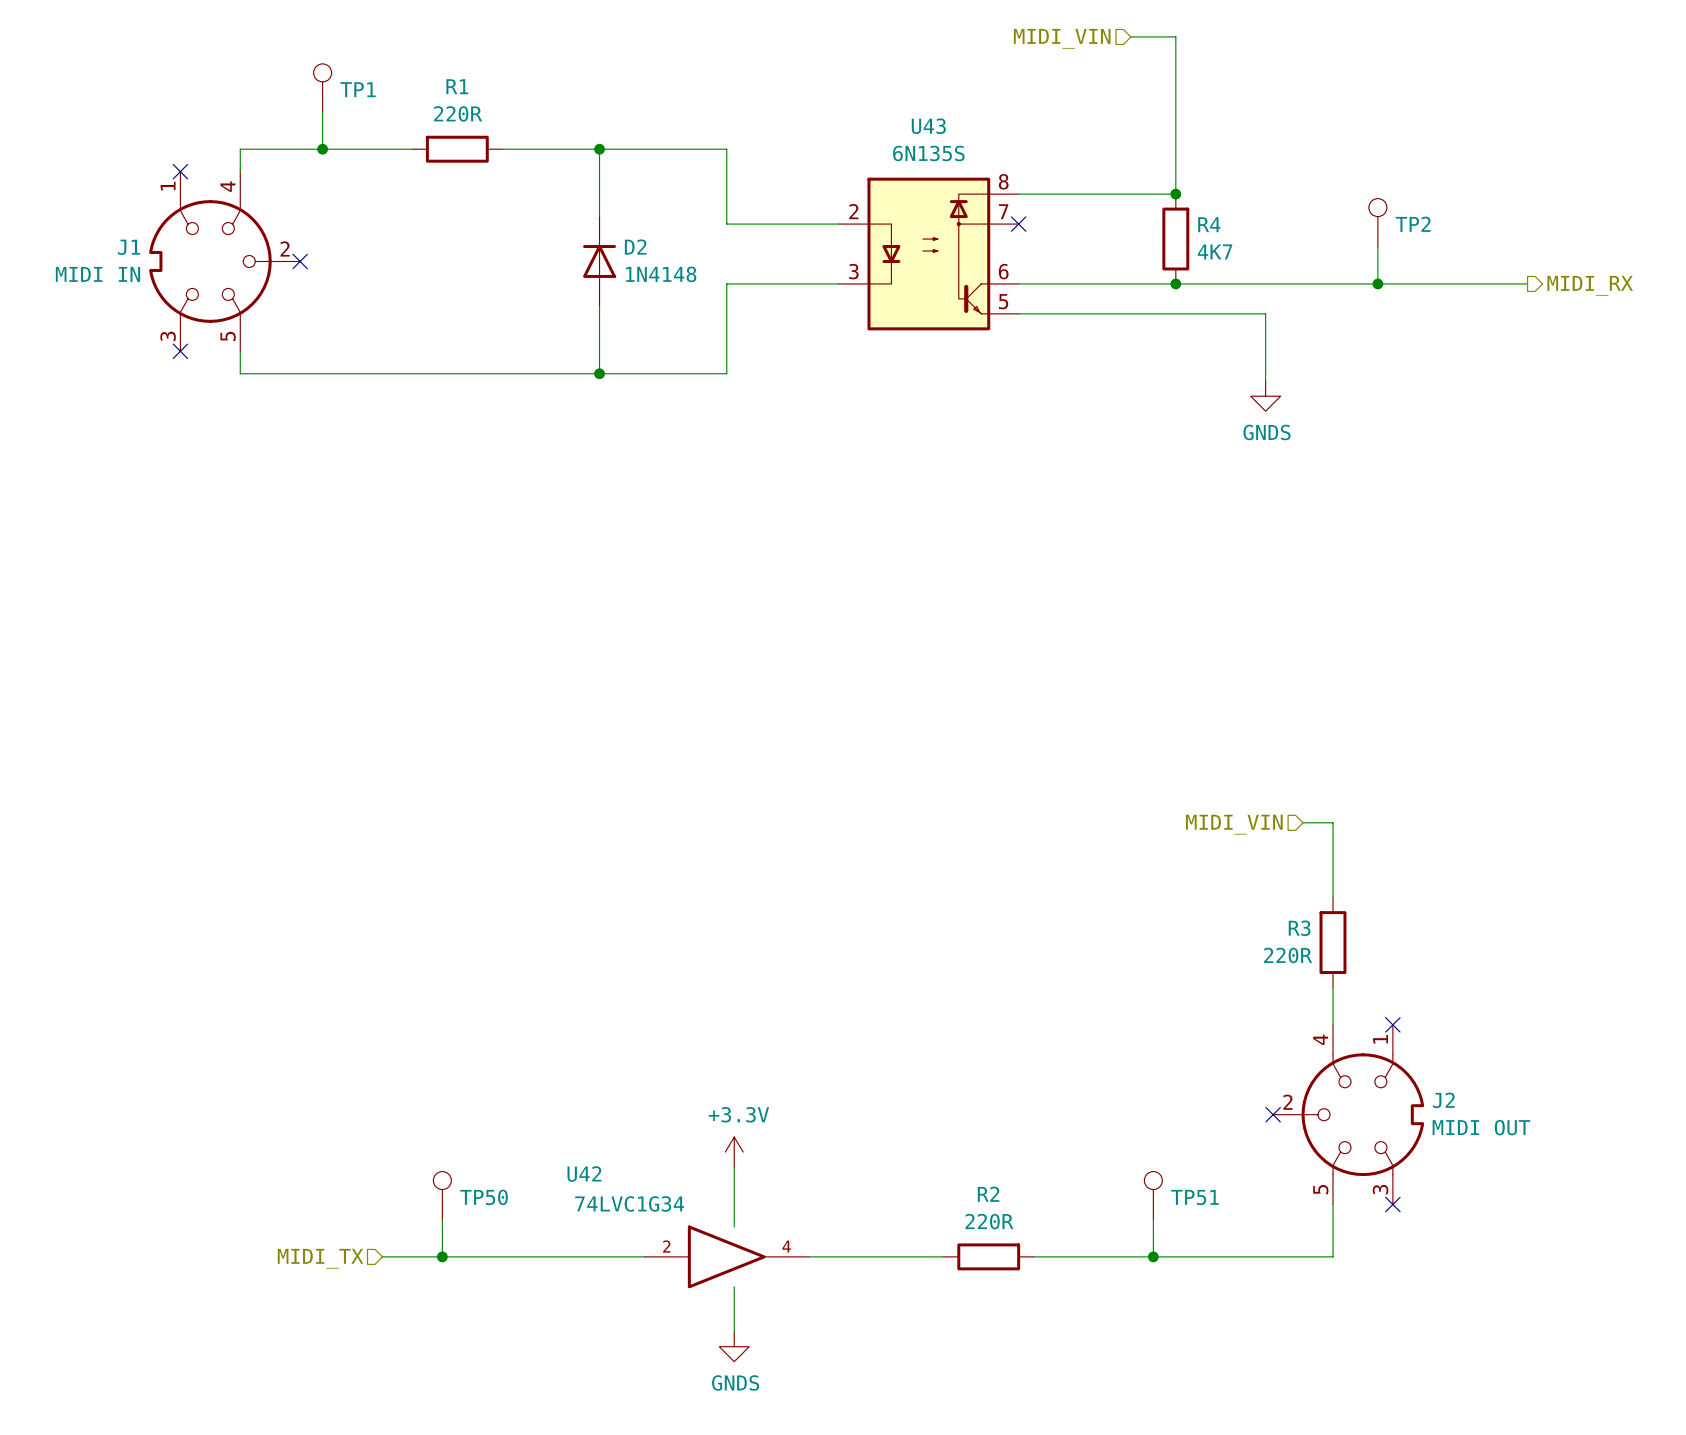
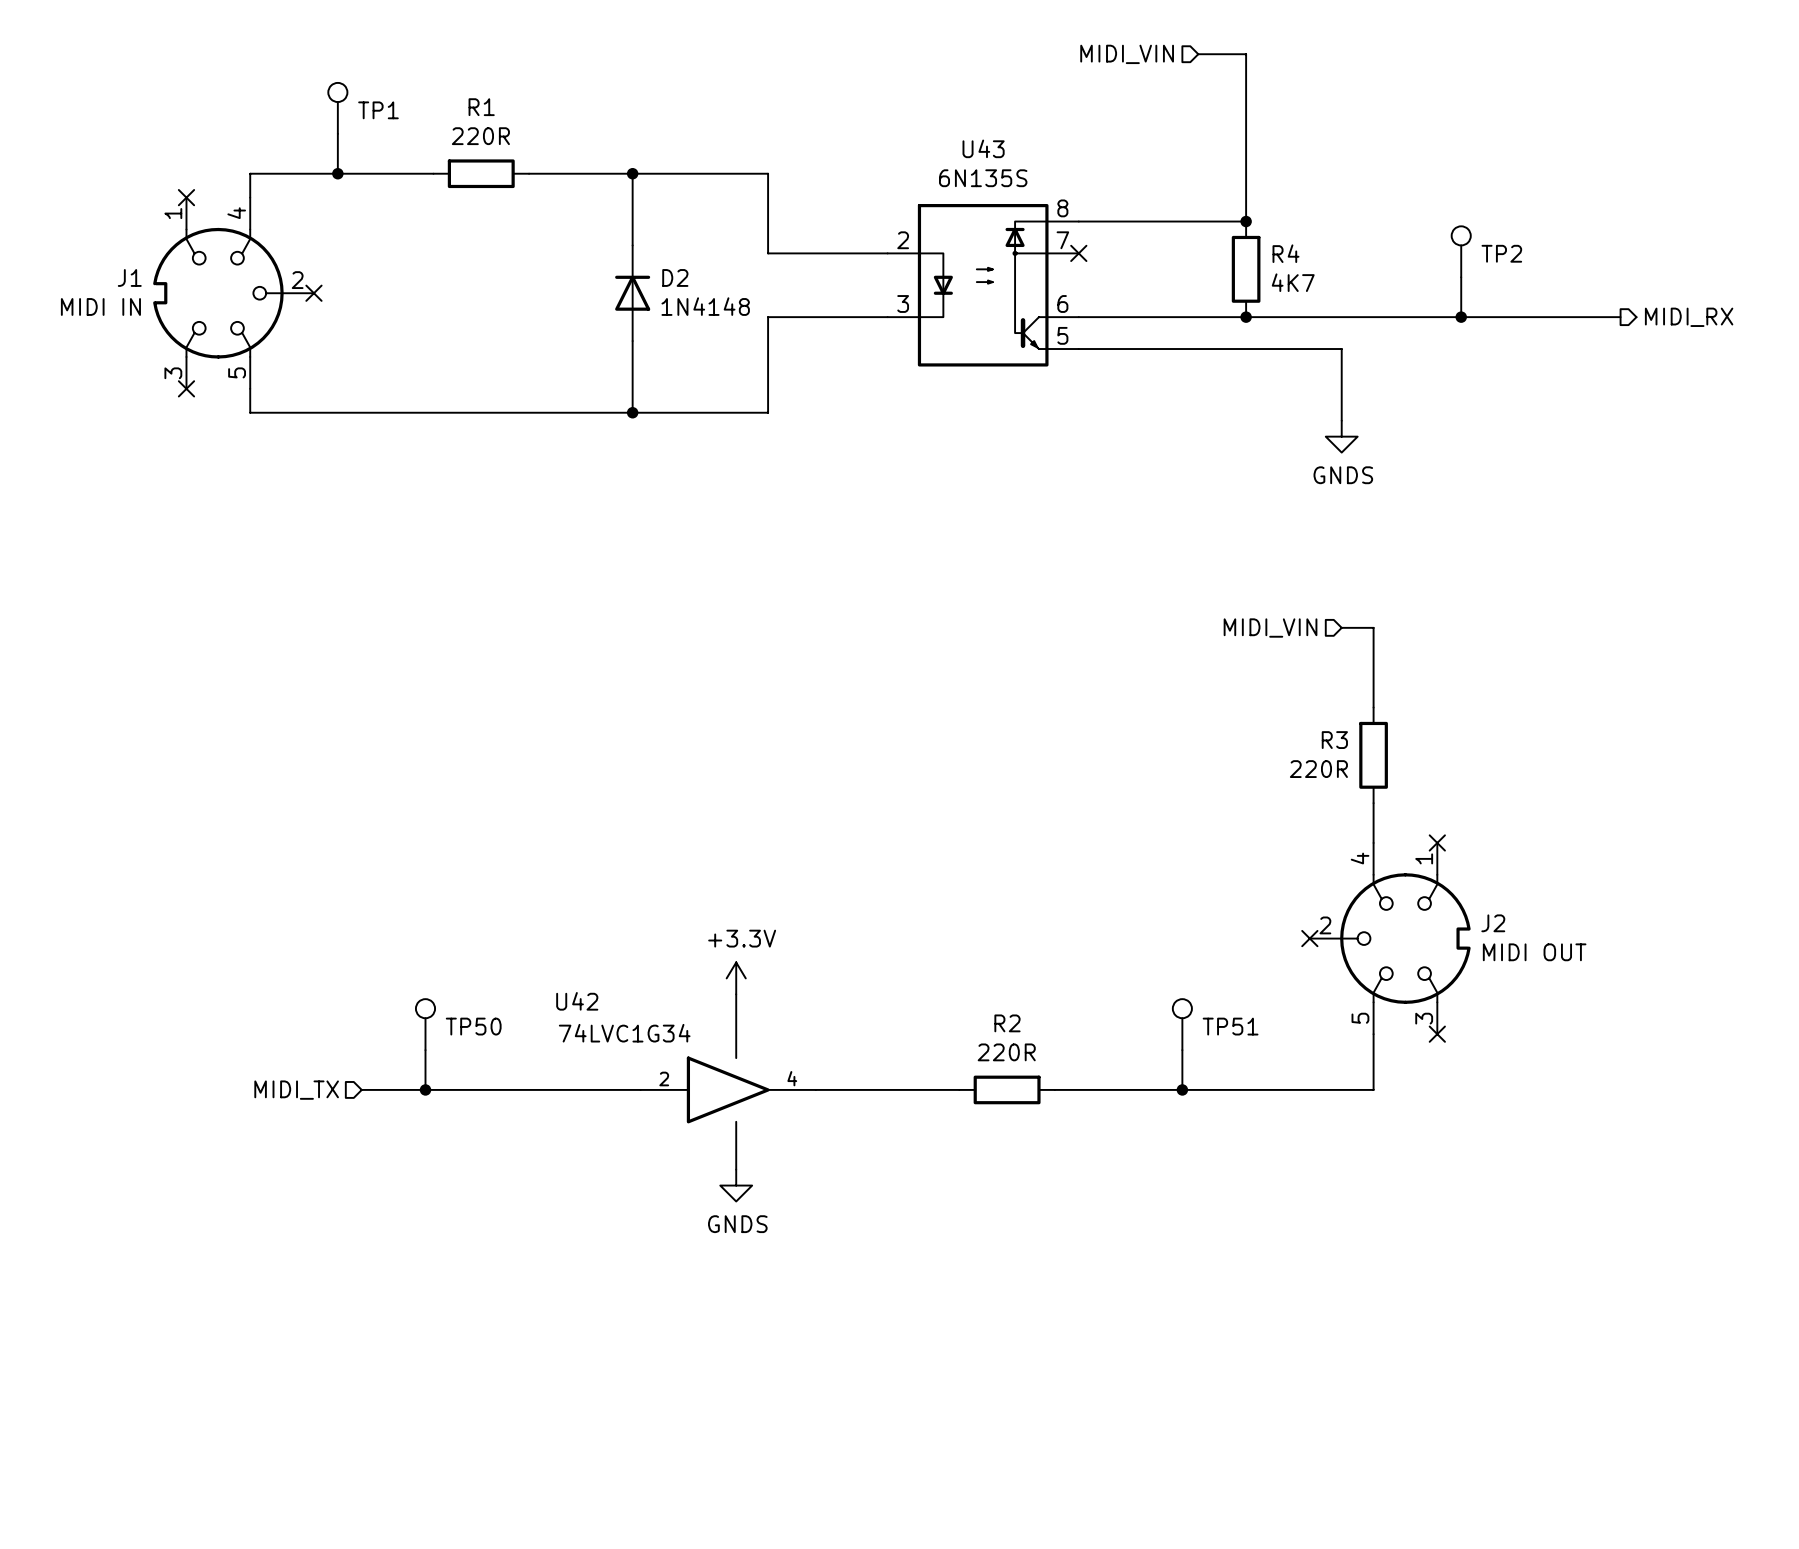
no-connect mark: none -> (1437, 842)
wire: (1303, 822) (1332, 822) (1332, 897) -> (1341, 627) (1373, 627) (1373, 707)
hierarchical label position: MIDI_VIN (1234, 824) -> MIDI_VIN (1270, 628)
no-connect mark: none -> (1309, 938)
R3 position: (1332, 942) -> (1373, 755)
no-connect mark: none -> (1437, 1034)
wire: (1332, 987) (1332, 1024) -> (1373, 803) (1373, 842)
junction: none -> (425, 1089)
junction: none -> (1182, 1089)
no-connect mark: (1392, 1024) -> none
no-connect mark: (1273, 1114) -> none
J2 position: (1348, 1114) -> (1390, 938)
power symbol position: +3.3V (734, 1152) -> +3.3V (736, 978)
wire: (734, 1167) (734, 1226) -> (736, 994) (736, 1058)
TP50 position: (442, 1195) -> (425, 1024)
TP51 position: (1153, 1195) -> (1182, 1024)
wire: (1332, 1204) (1332, 1256) (1033, 1256) -> (1373, 1034) (1373, 1089) (1054, 1089)
no-connect mark: (1392, 1204) -> none
wire: (442, 1219) (442, 1256) -> (425, 1050) (425, 1089)
wire: (1153, 1219) (1153, 1256) -> (1182, 1050) (1182, 1089)
wire: (382, 1256) (644, 1256) -> (361, 1089) (640, 1089)
junction: (442, 1256) -> none
U42 position: (726, 1256) -> (728, 1089)
wire: (809, 1256) (943, 1256) -> (815, 1089) (959, 1089)
R2 position: (988, 1256) -> (1007, 1089)
junction: (1153, 1256) -> none
hierarchical label position: MIDI_TX (320, 1258) -> MIDI_TX (296, 1090)
wire: (734, 1286) (734, 1331) -> (736, 1121) (736, 1169)
power symbol position: GNDS (734, 1346) -> GNDS (736, 1185)

